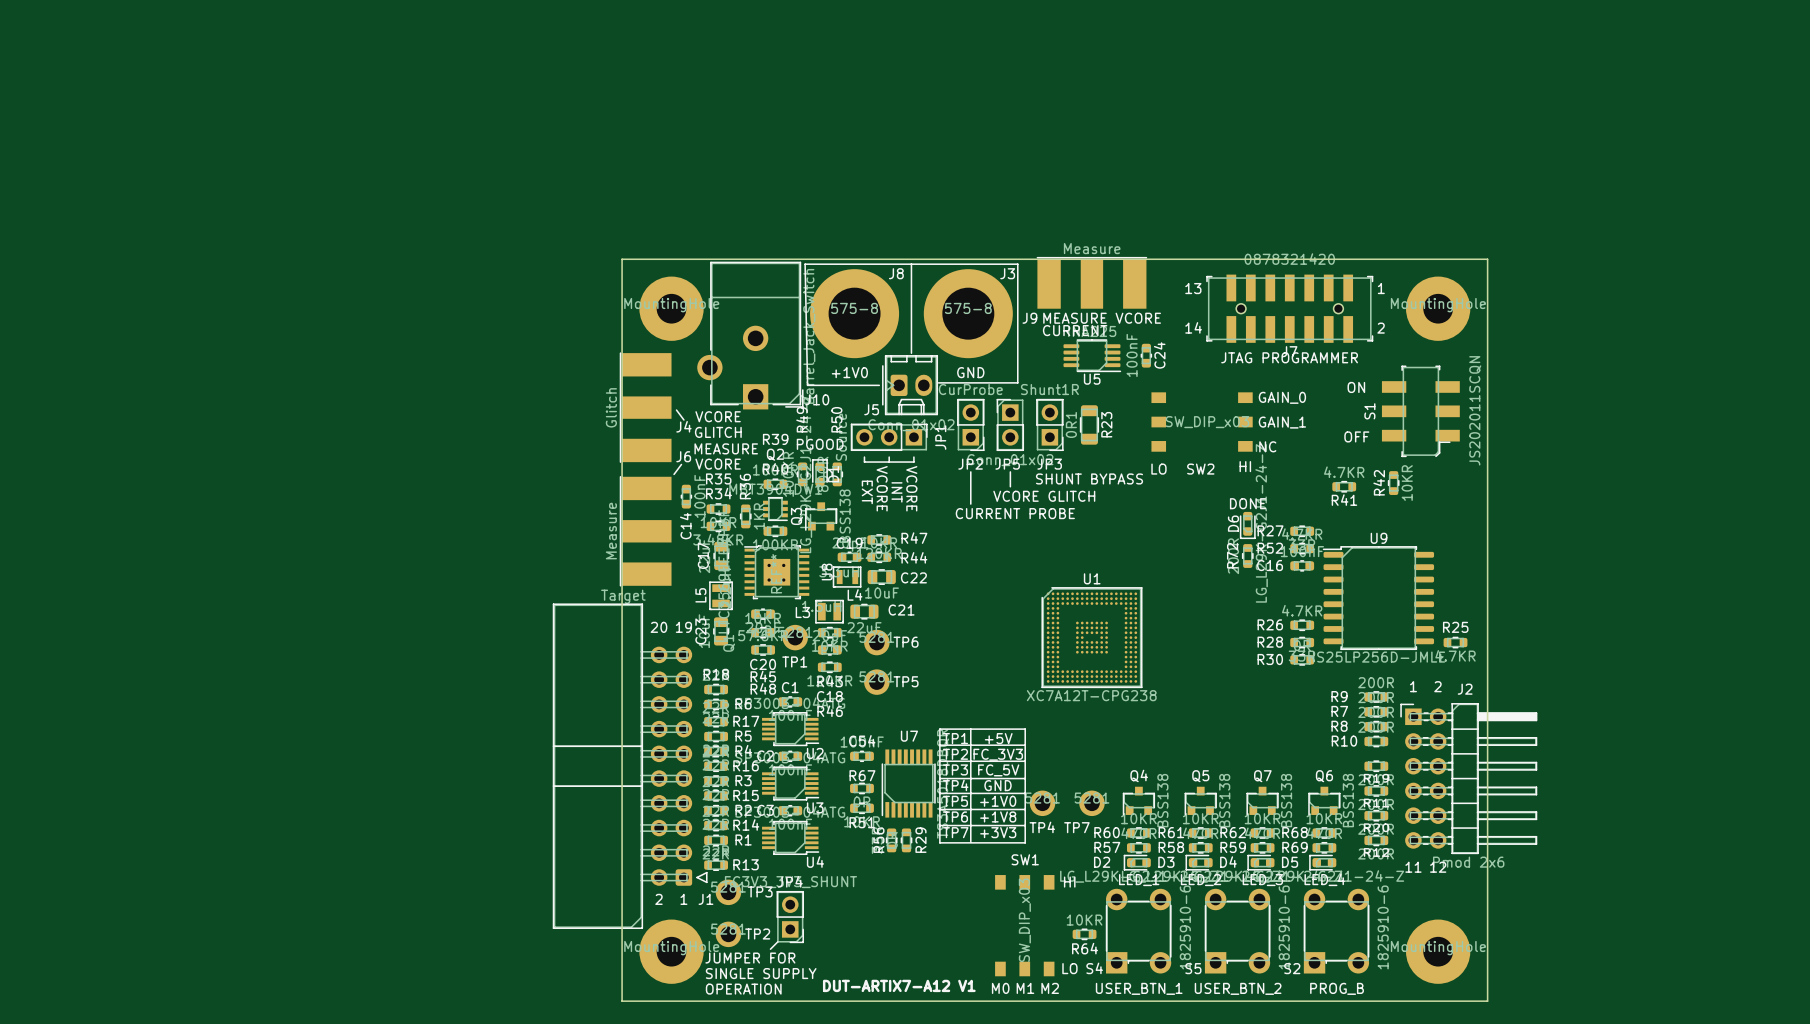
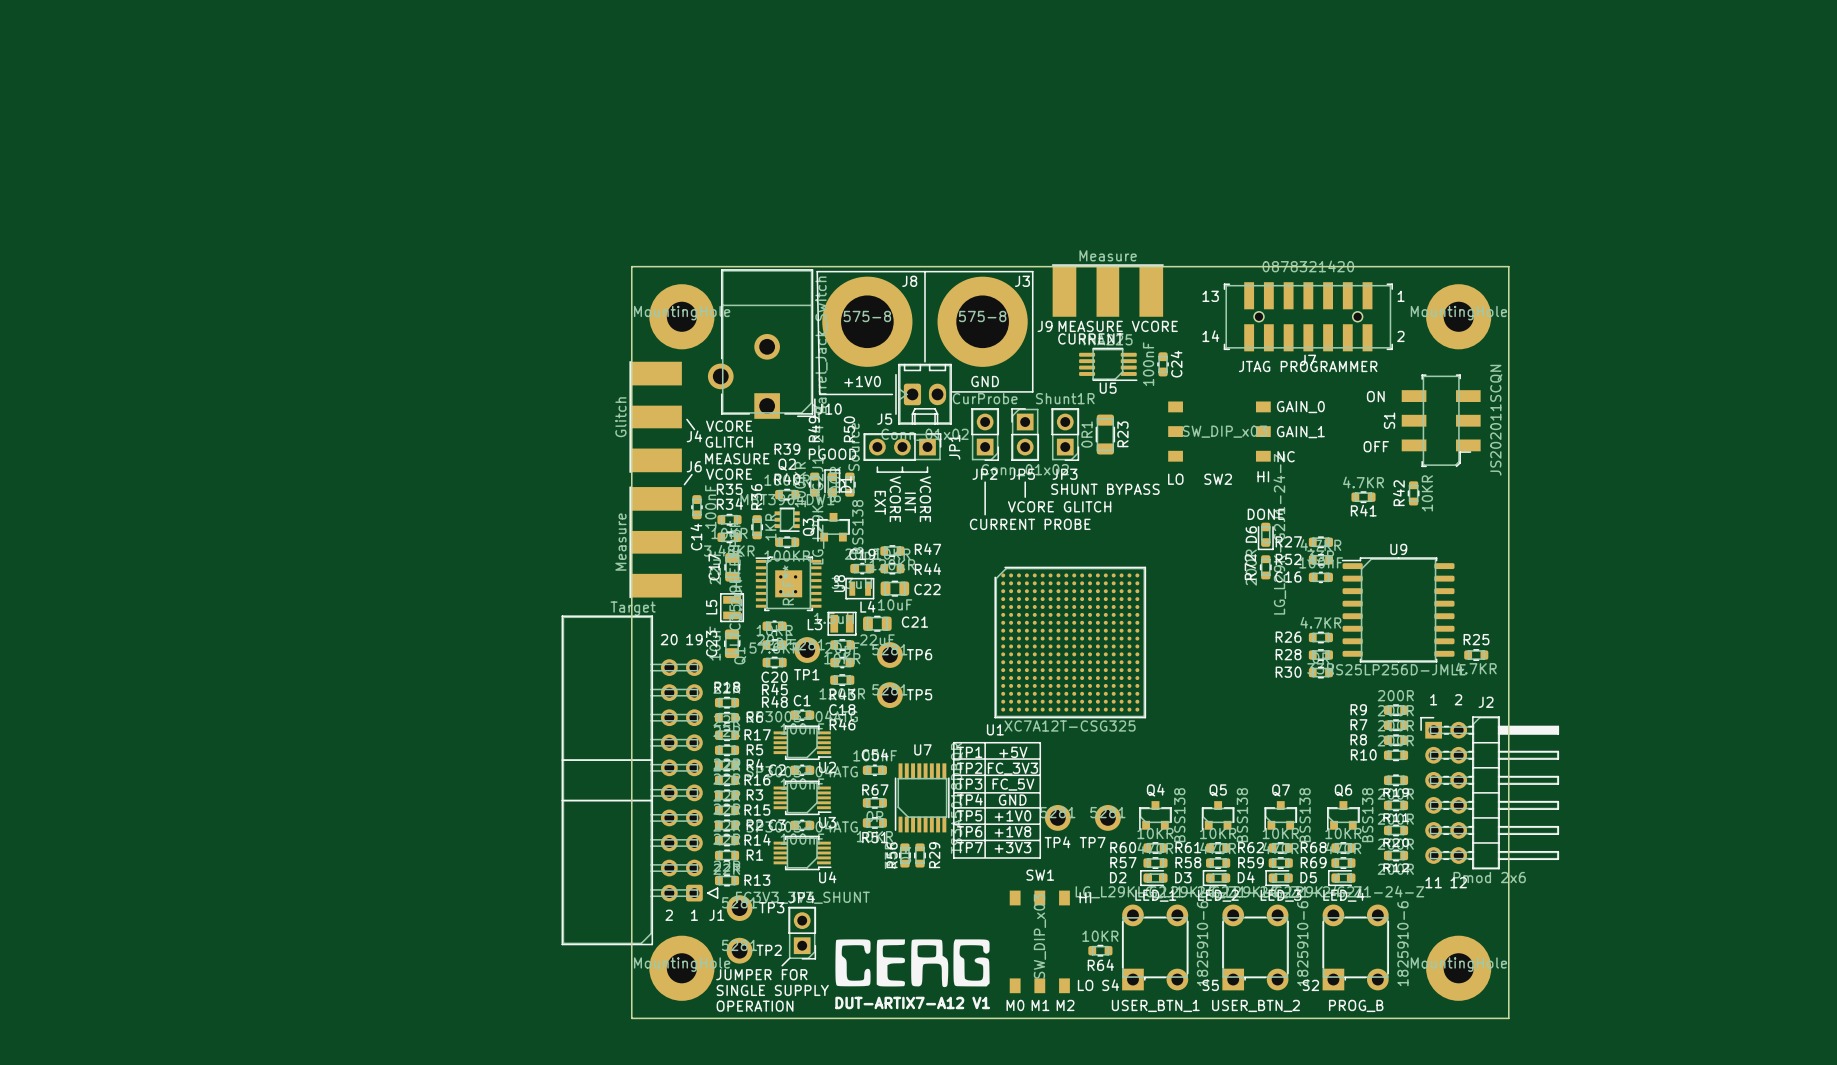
U1 name position: U1 (1092, 578) -> U1 (995, 729)
U1 footprint: [1041, 587, 1143, 688] -> [994, 566, 1146, 719]
U1 value: XC7A12T-CPG238 (1091, 695) -> XC7A12T-CSG325 (1070, 726)
drawing: none -> [835, 939, 990, 988]

